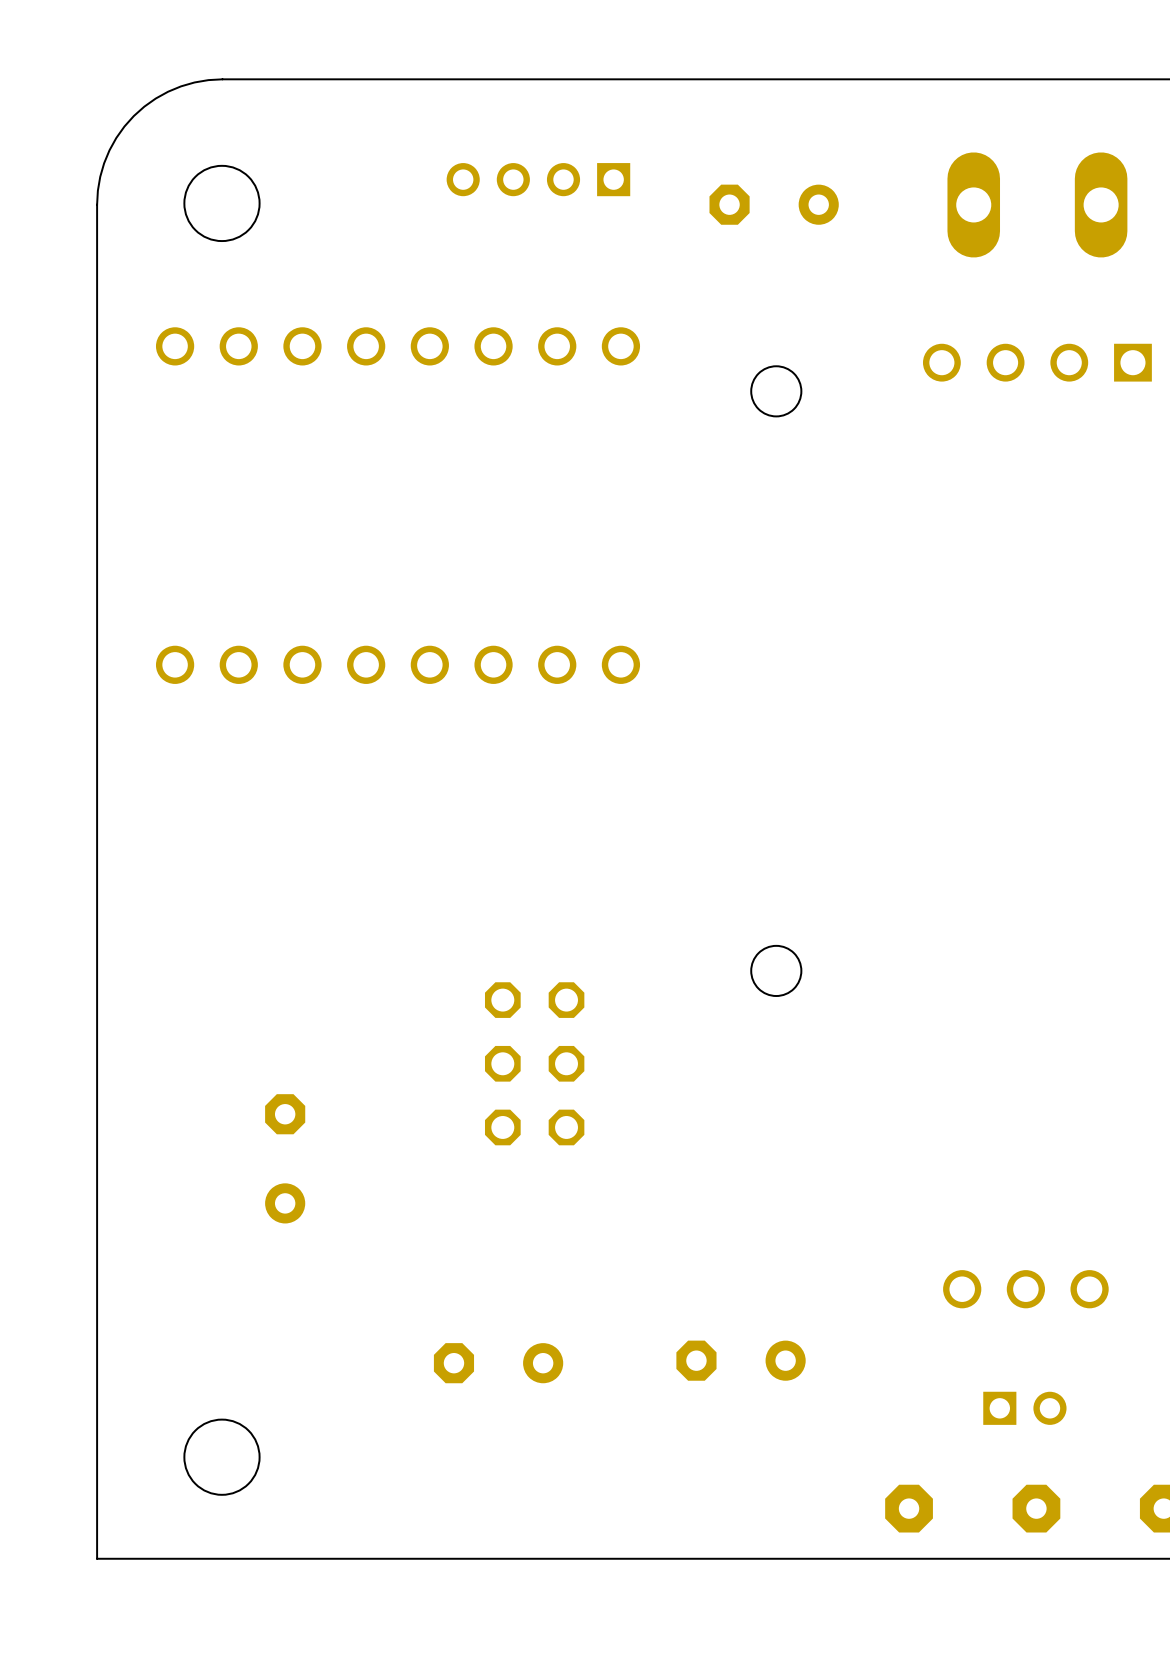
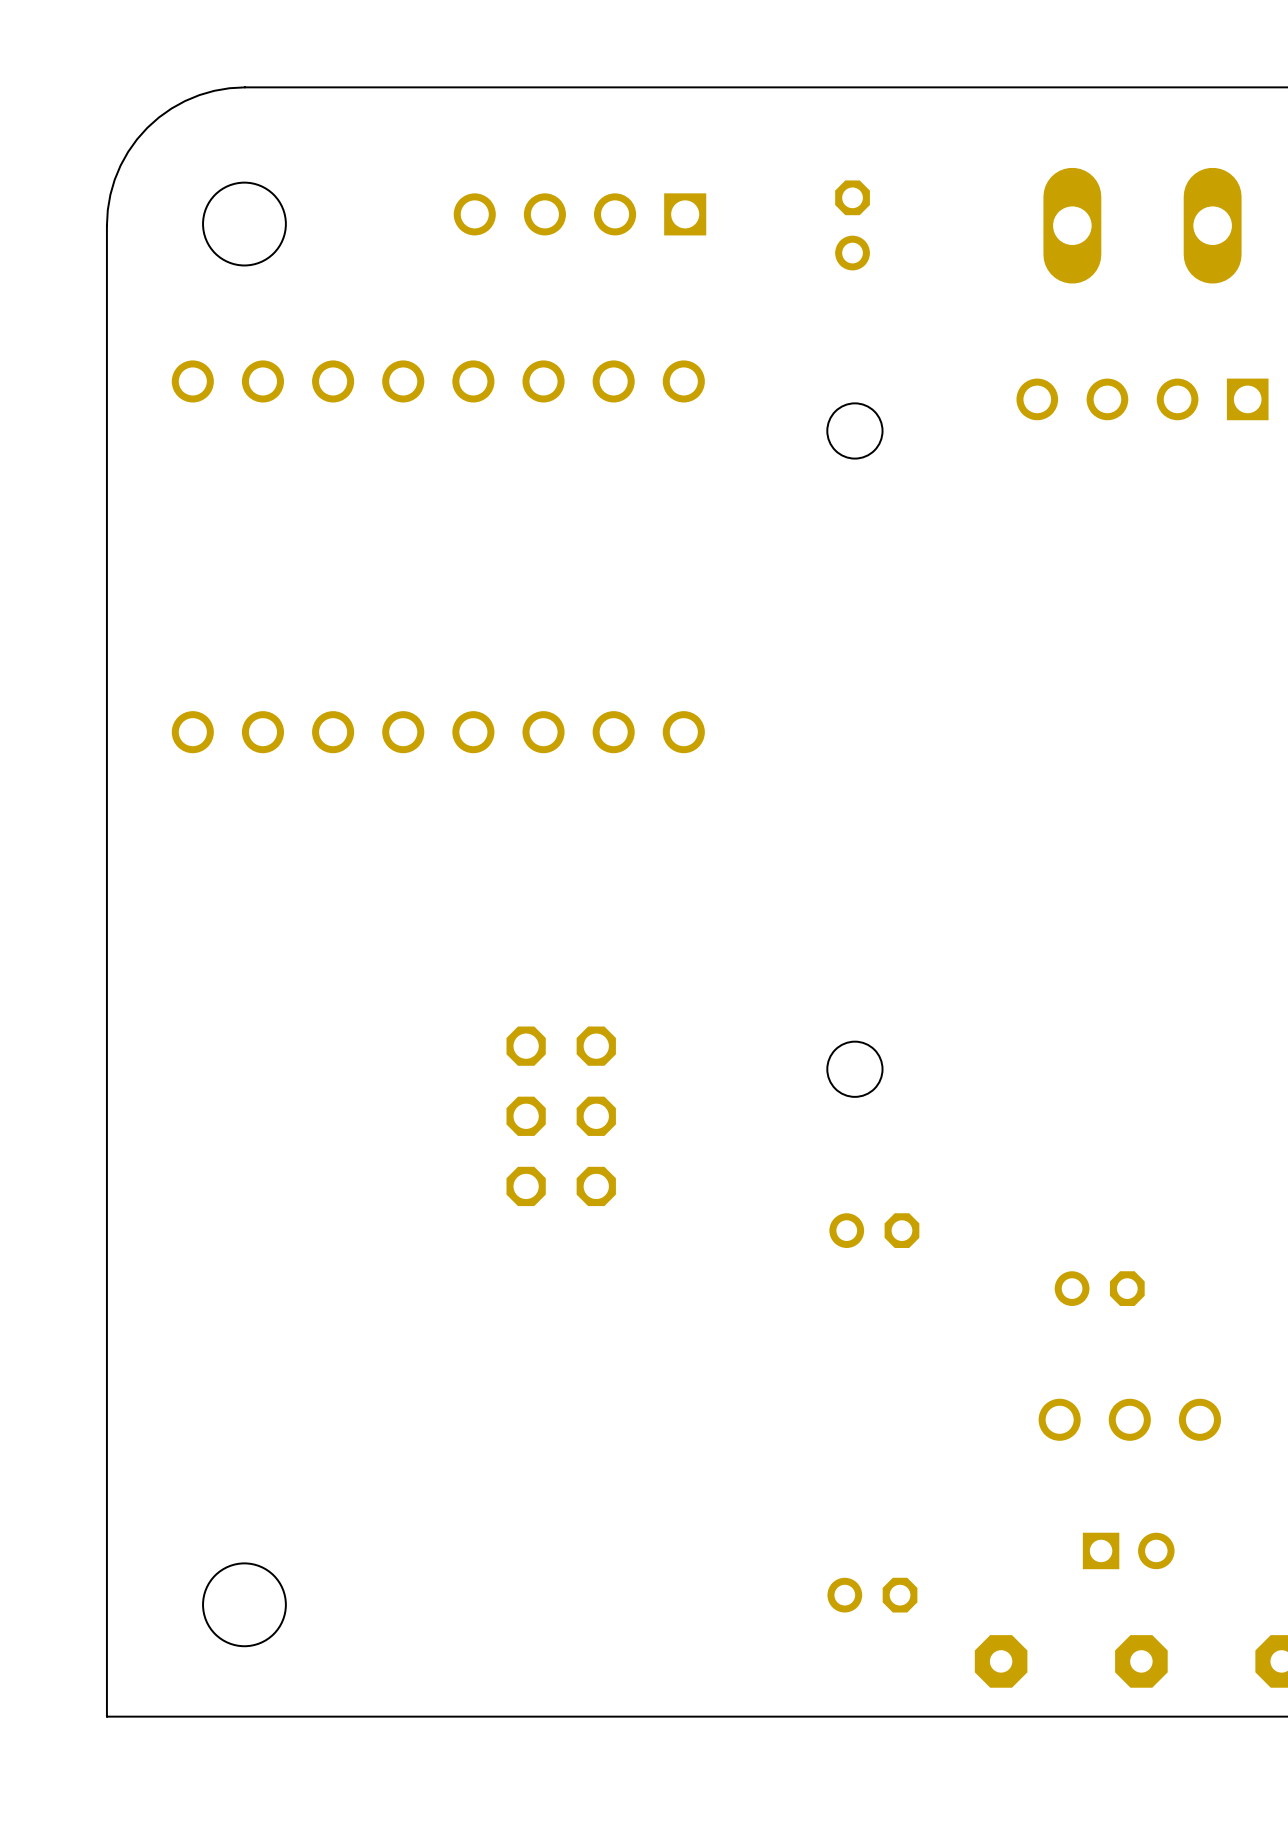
part footprint: [446, 163, 631, 197] -> [453, 193, 707, 236]
part footprint: [709, 184, 839, 225] -> [835, 180, 870, 271]
part position: (534, 1063) -> (561, 1116)
part: none -> (874, 1230)
part: (285, 1158) -> none
part: none -> (1099, 1288)
part: (741, 1360) -> none
part: (498, 1363) -> none
part: none -> (872, 1595)

